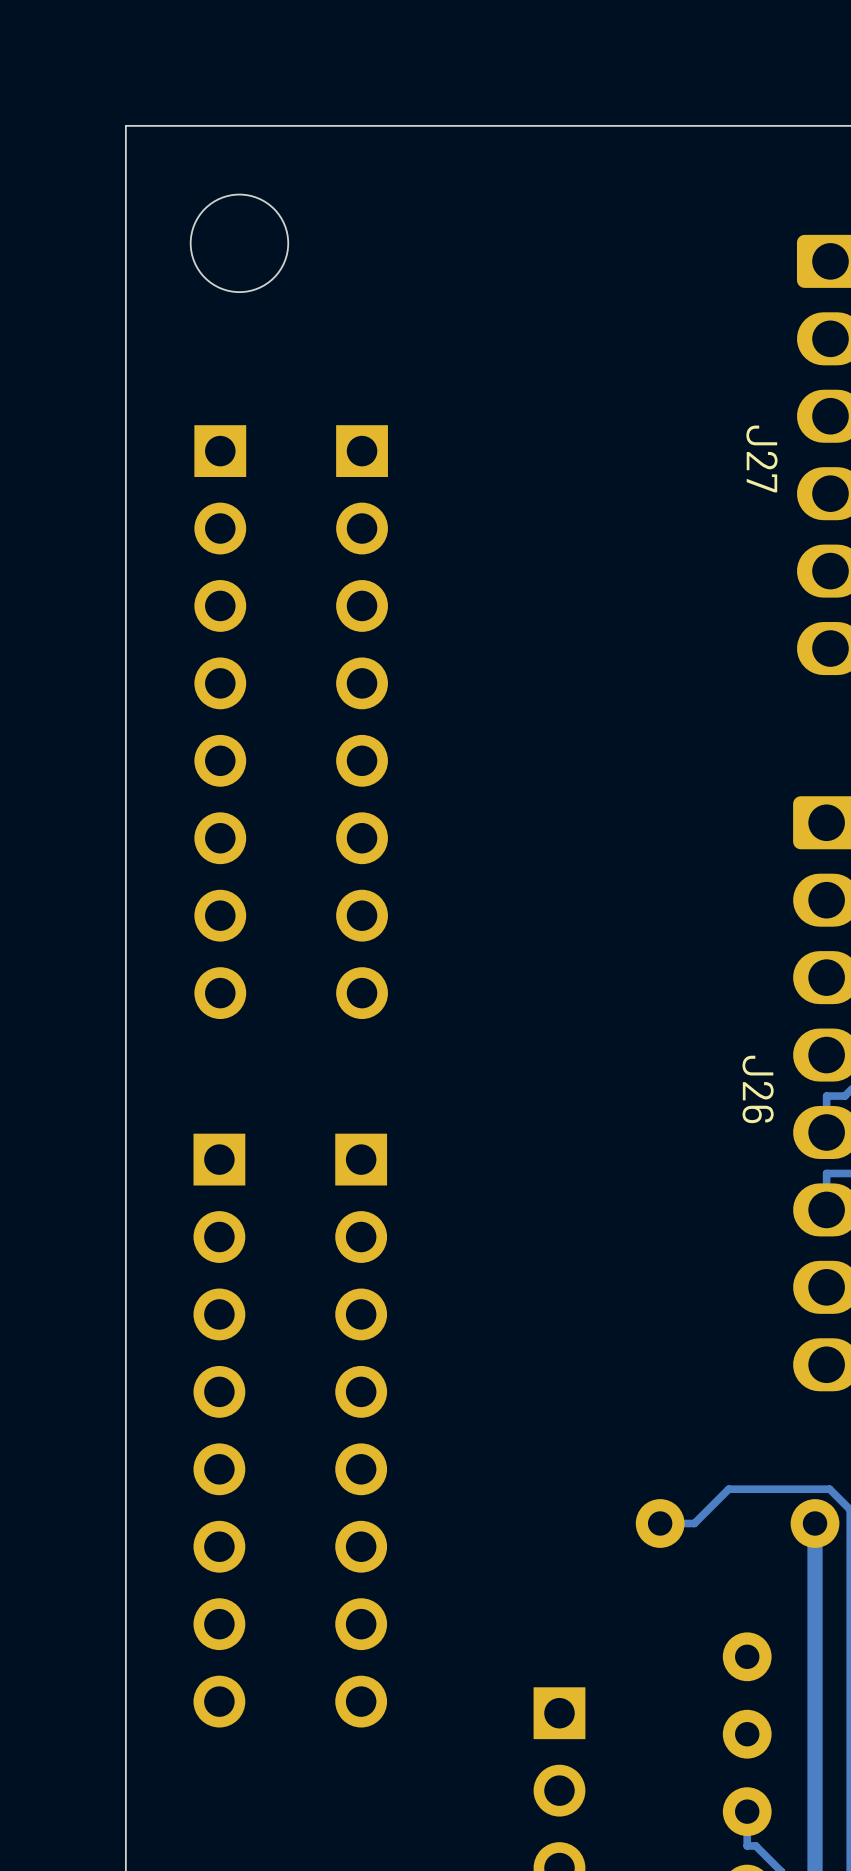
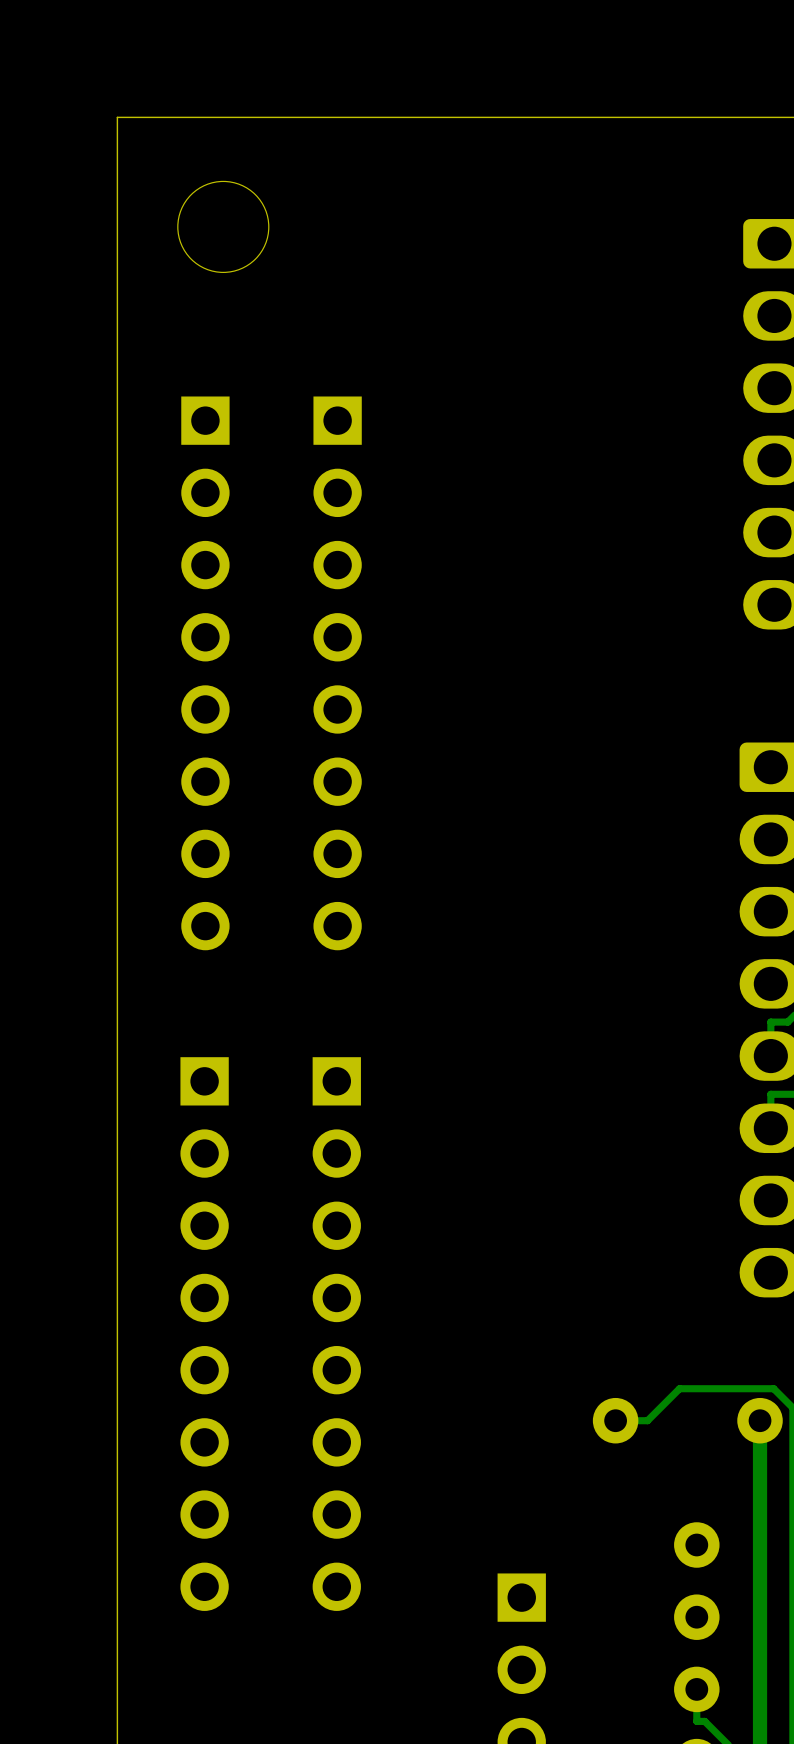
J27 name: J27 (761, 458) -> none
J26 name: J26 (758, 1089) -> none

